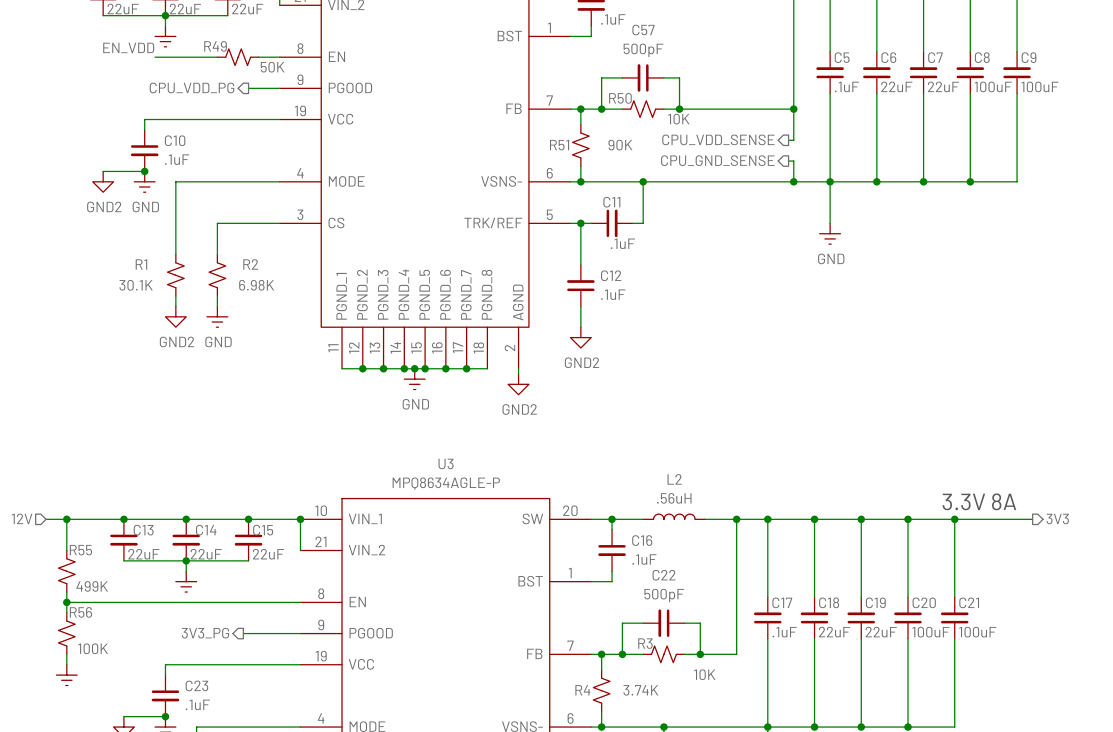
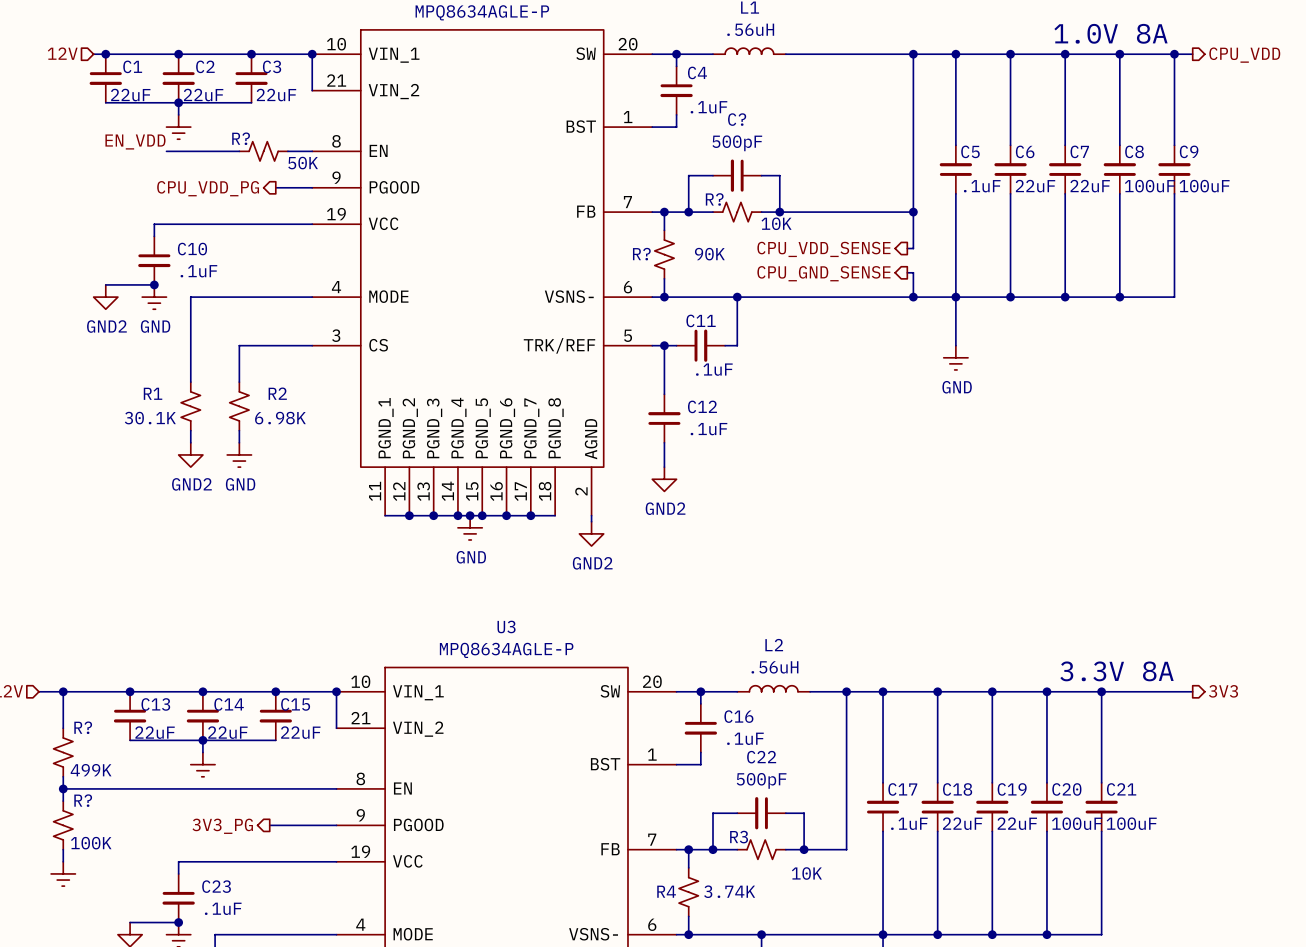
C57 name: C57 (643, 30) -> C? (737, 119)
R49 name: R49 (215, 46) -> R? (241, 138)
R50 name: R50 (620, 98) -> R? (714, 199)
R51 name: R51 (559, 145) -> R? (641, 254)
R55 name: R55 (80, 550) -> R? (83, 727)
R56 name: R56 (80, 612) -> R? (83, 800)

